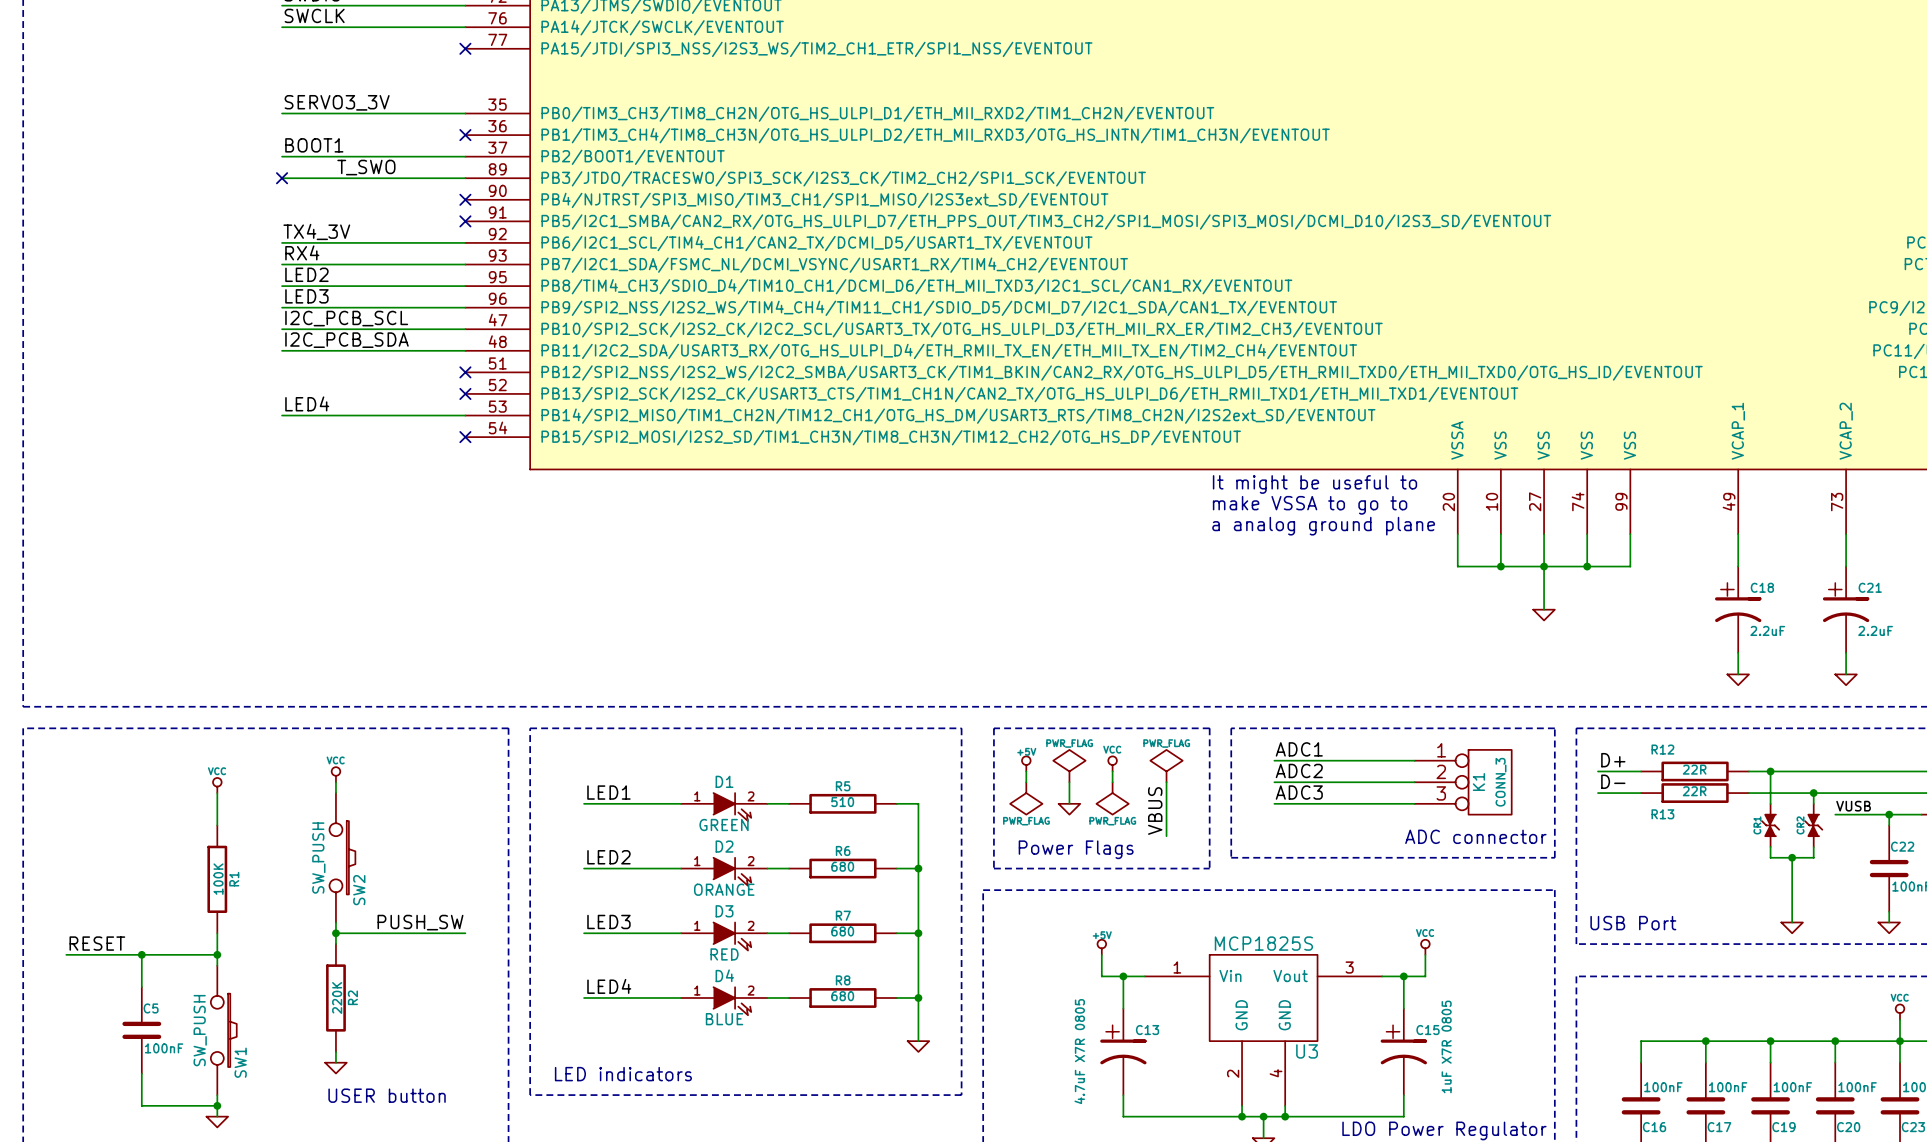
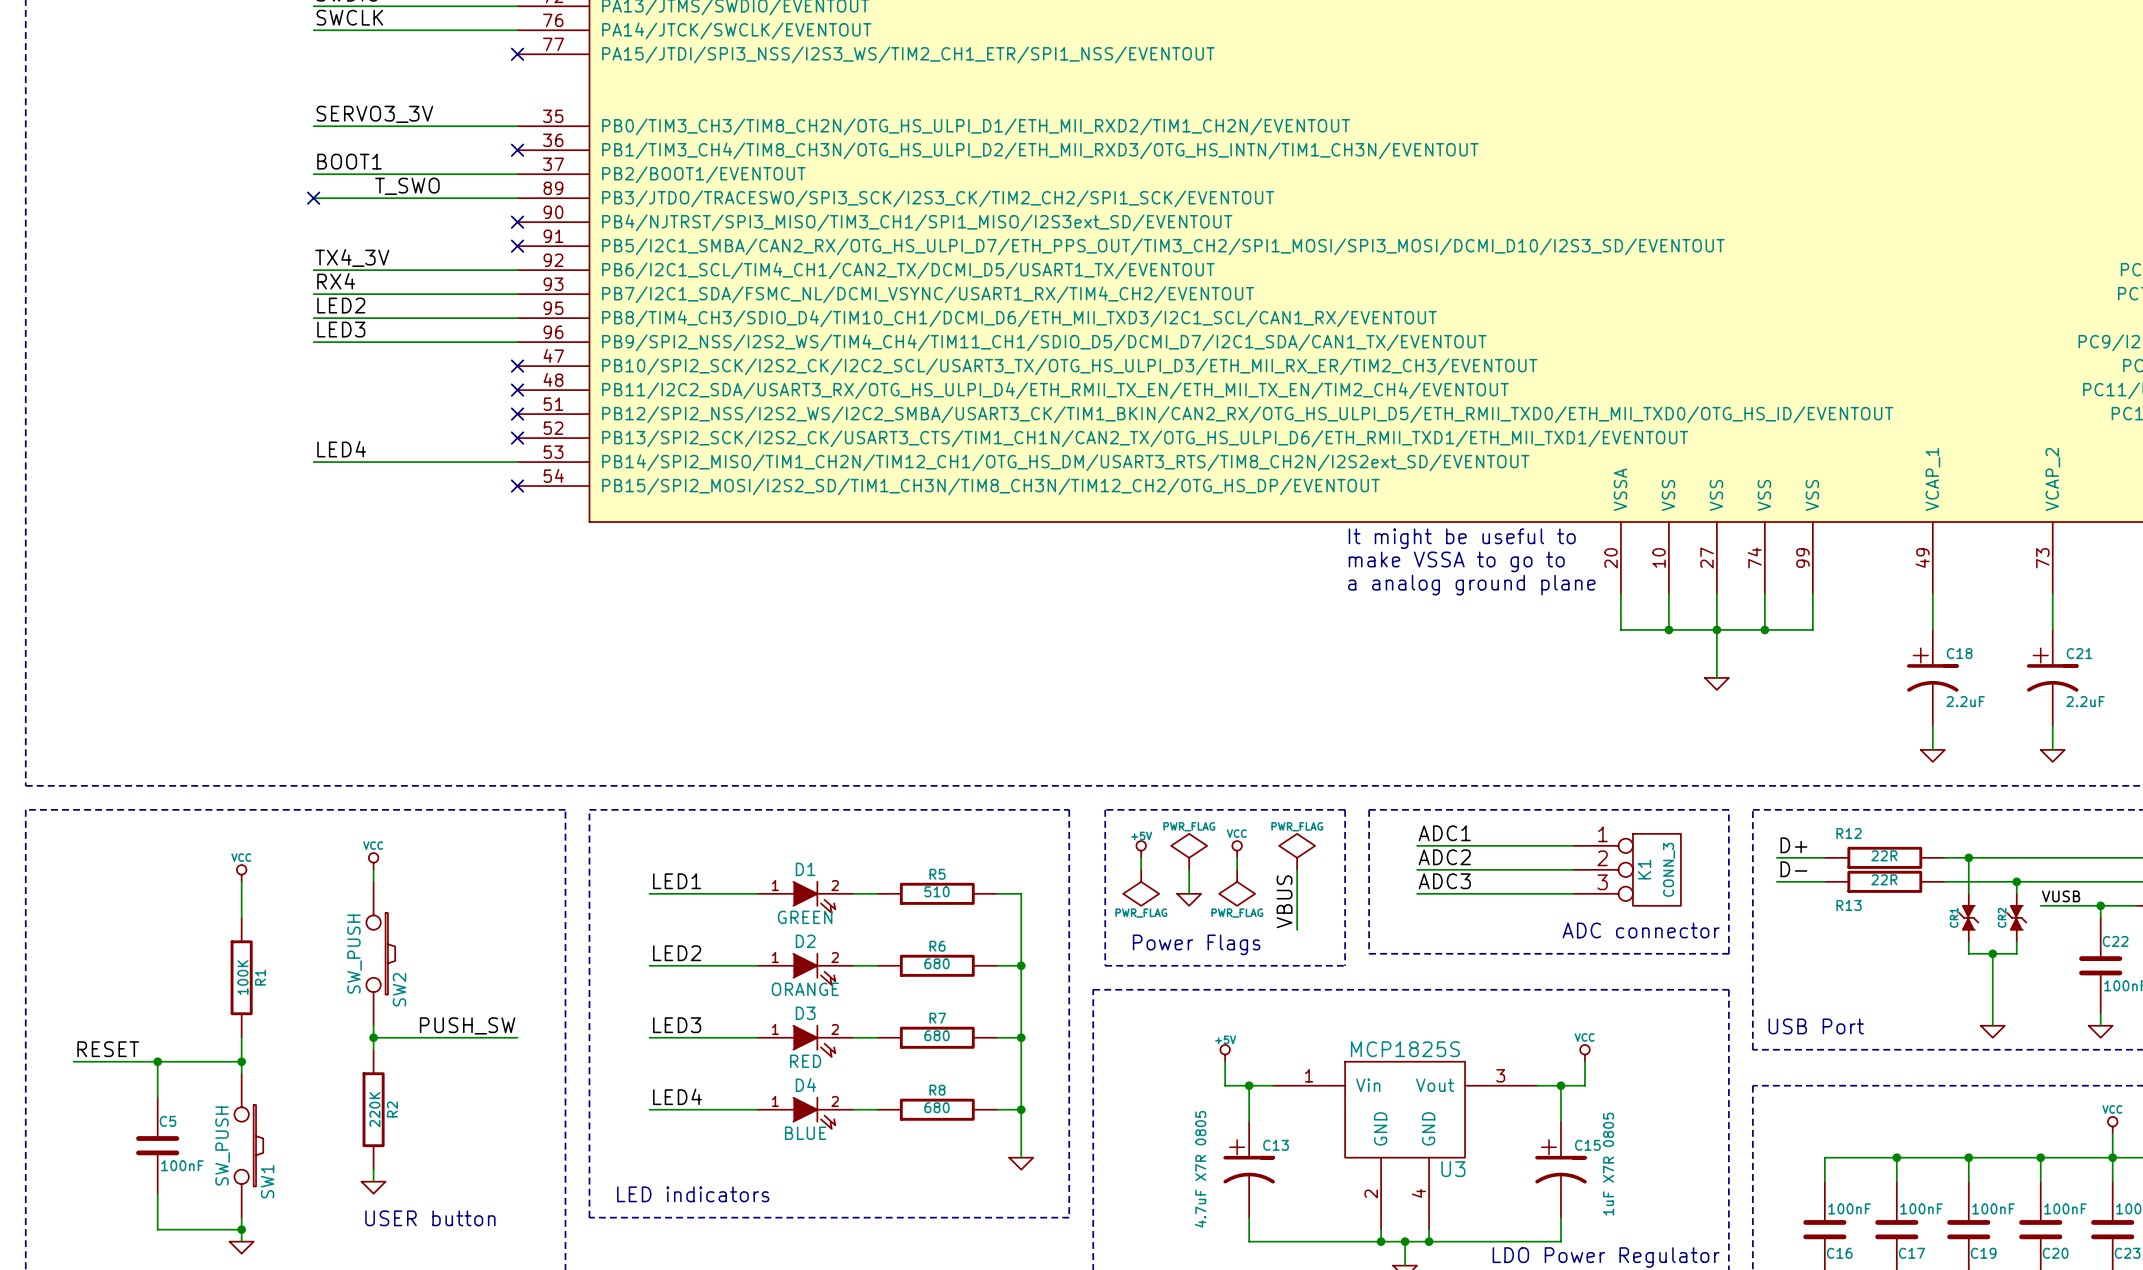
label: I2C_PCB_SCL (346, 318) -> none
wire: (282, 329) (465, 329) -> none
no-connect mark: none -> (517, 366)
label: I2C_PCB_SDA (346, 340) -> none
wire: (282, 350) (465, 350) -> none
no-connect mark: none -> (517, 390)

